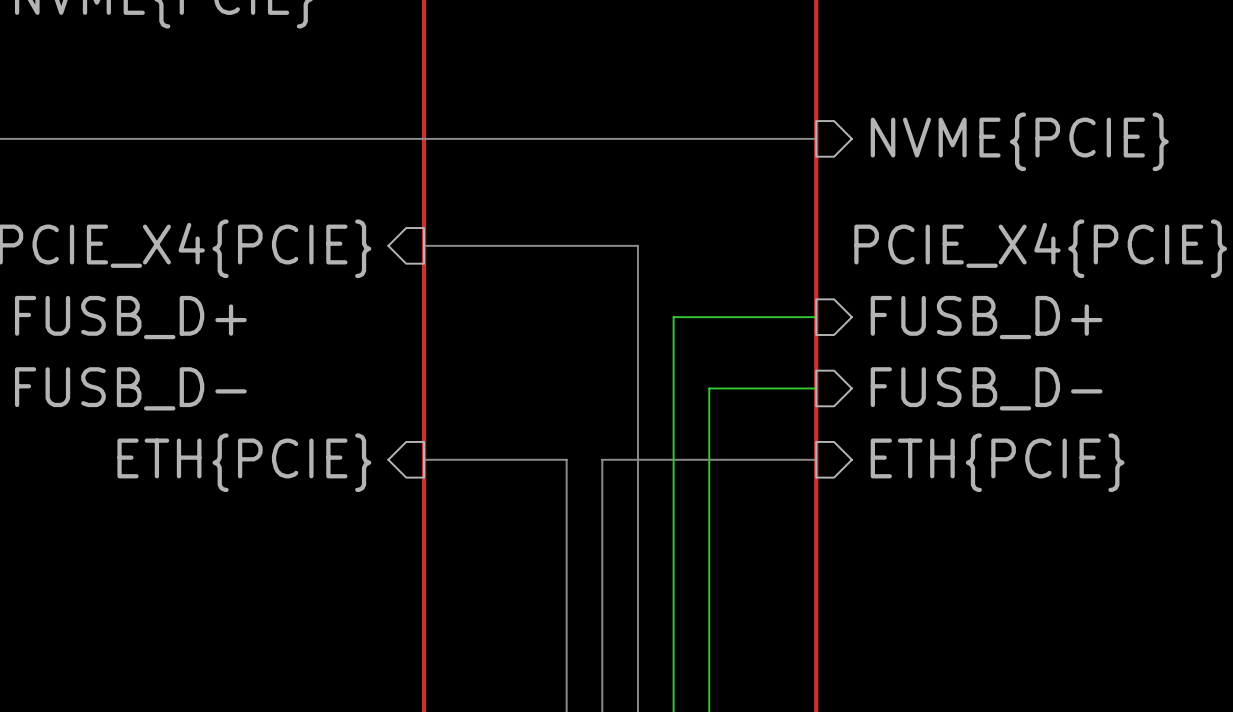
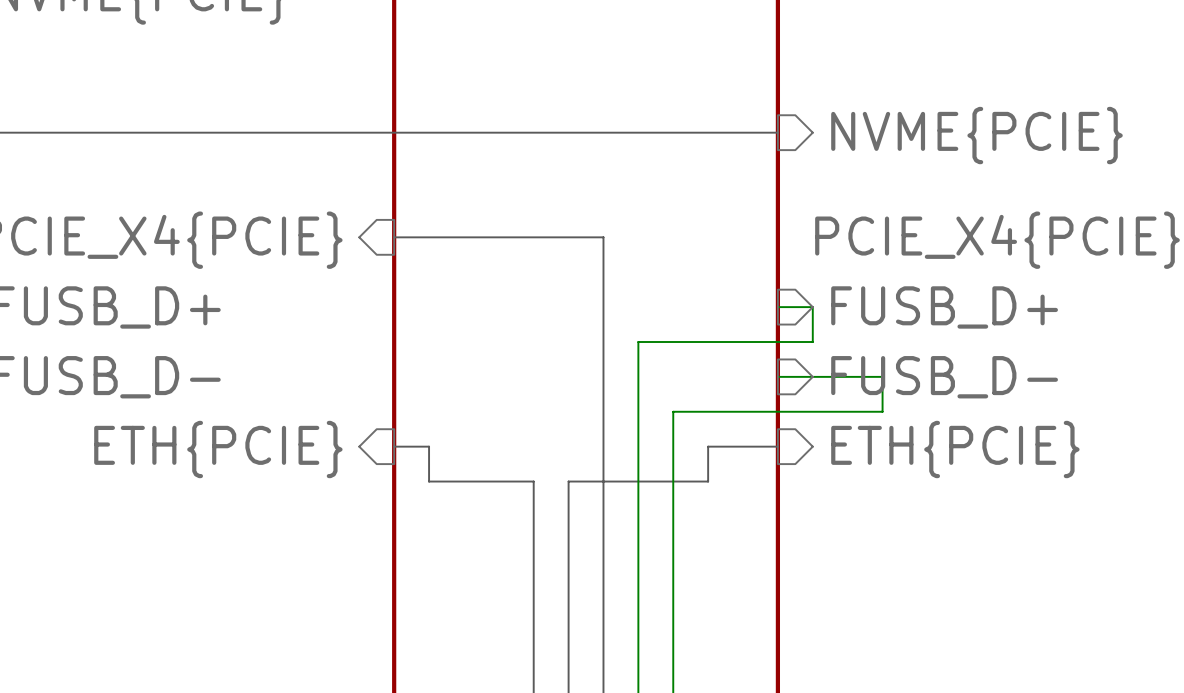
wire: (816, 317) (673, 317) (673, 352) -> (777, 307) (812, 307) (812, 342) (638, 342)
wire: (816, 388) (709, 388) (709, 424) -> (777, 376) (882, 376) (882, 411) (673, 411)
bus: (459, 459) (566, 459) (566, 495) -> (429, 446) (429, 481) (533, 481)
bus: (744, 459) (602, 459) (602, 495) -> (708, 446) (708, 481) (568, 481)

